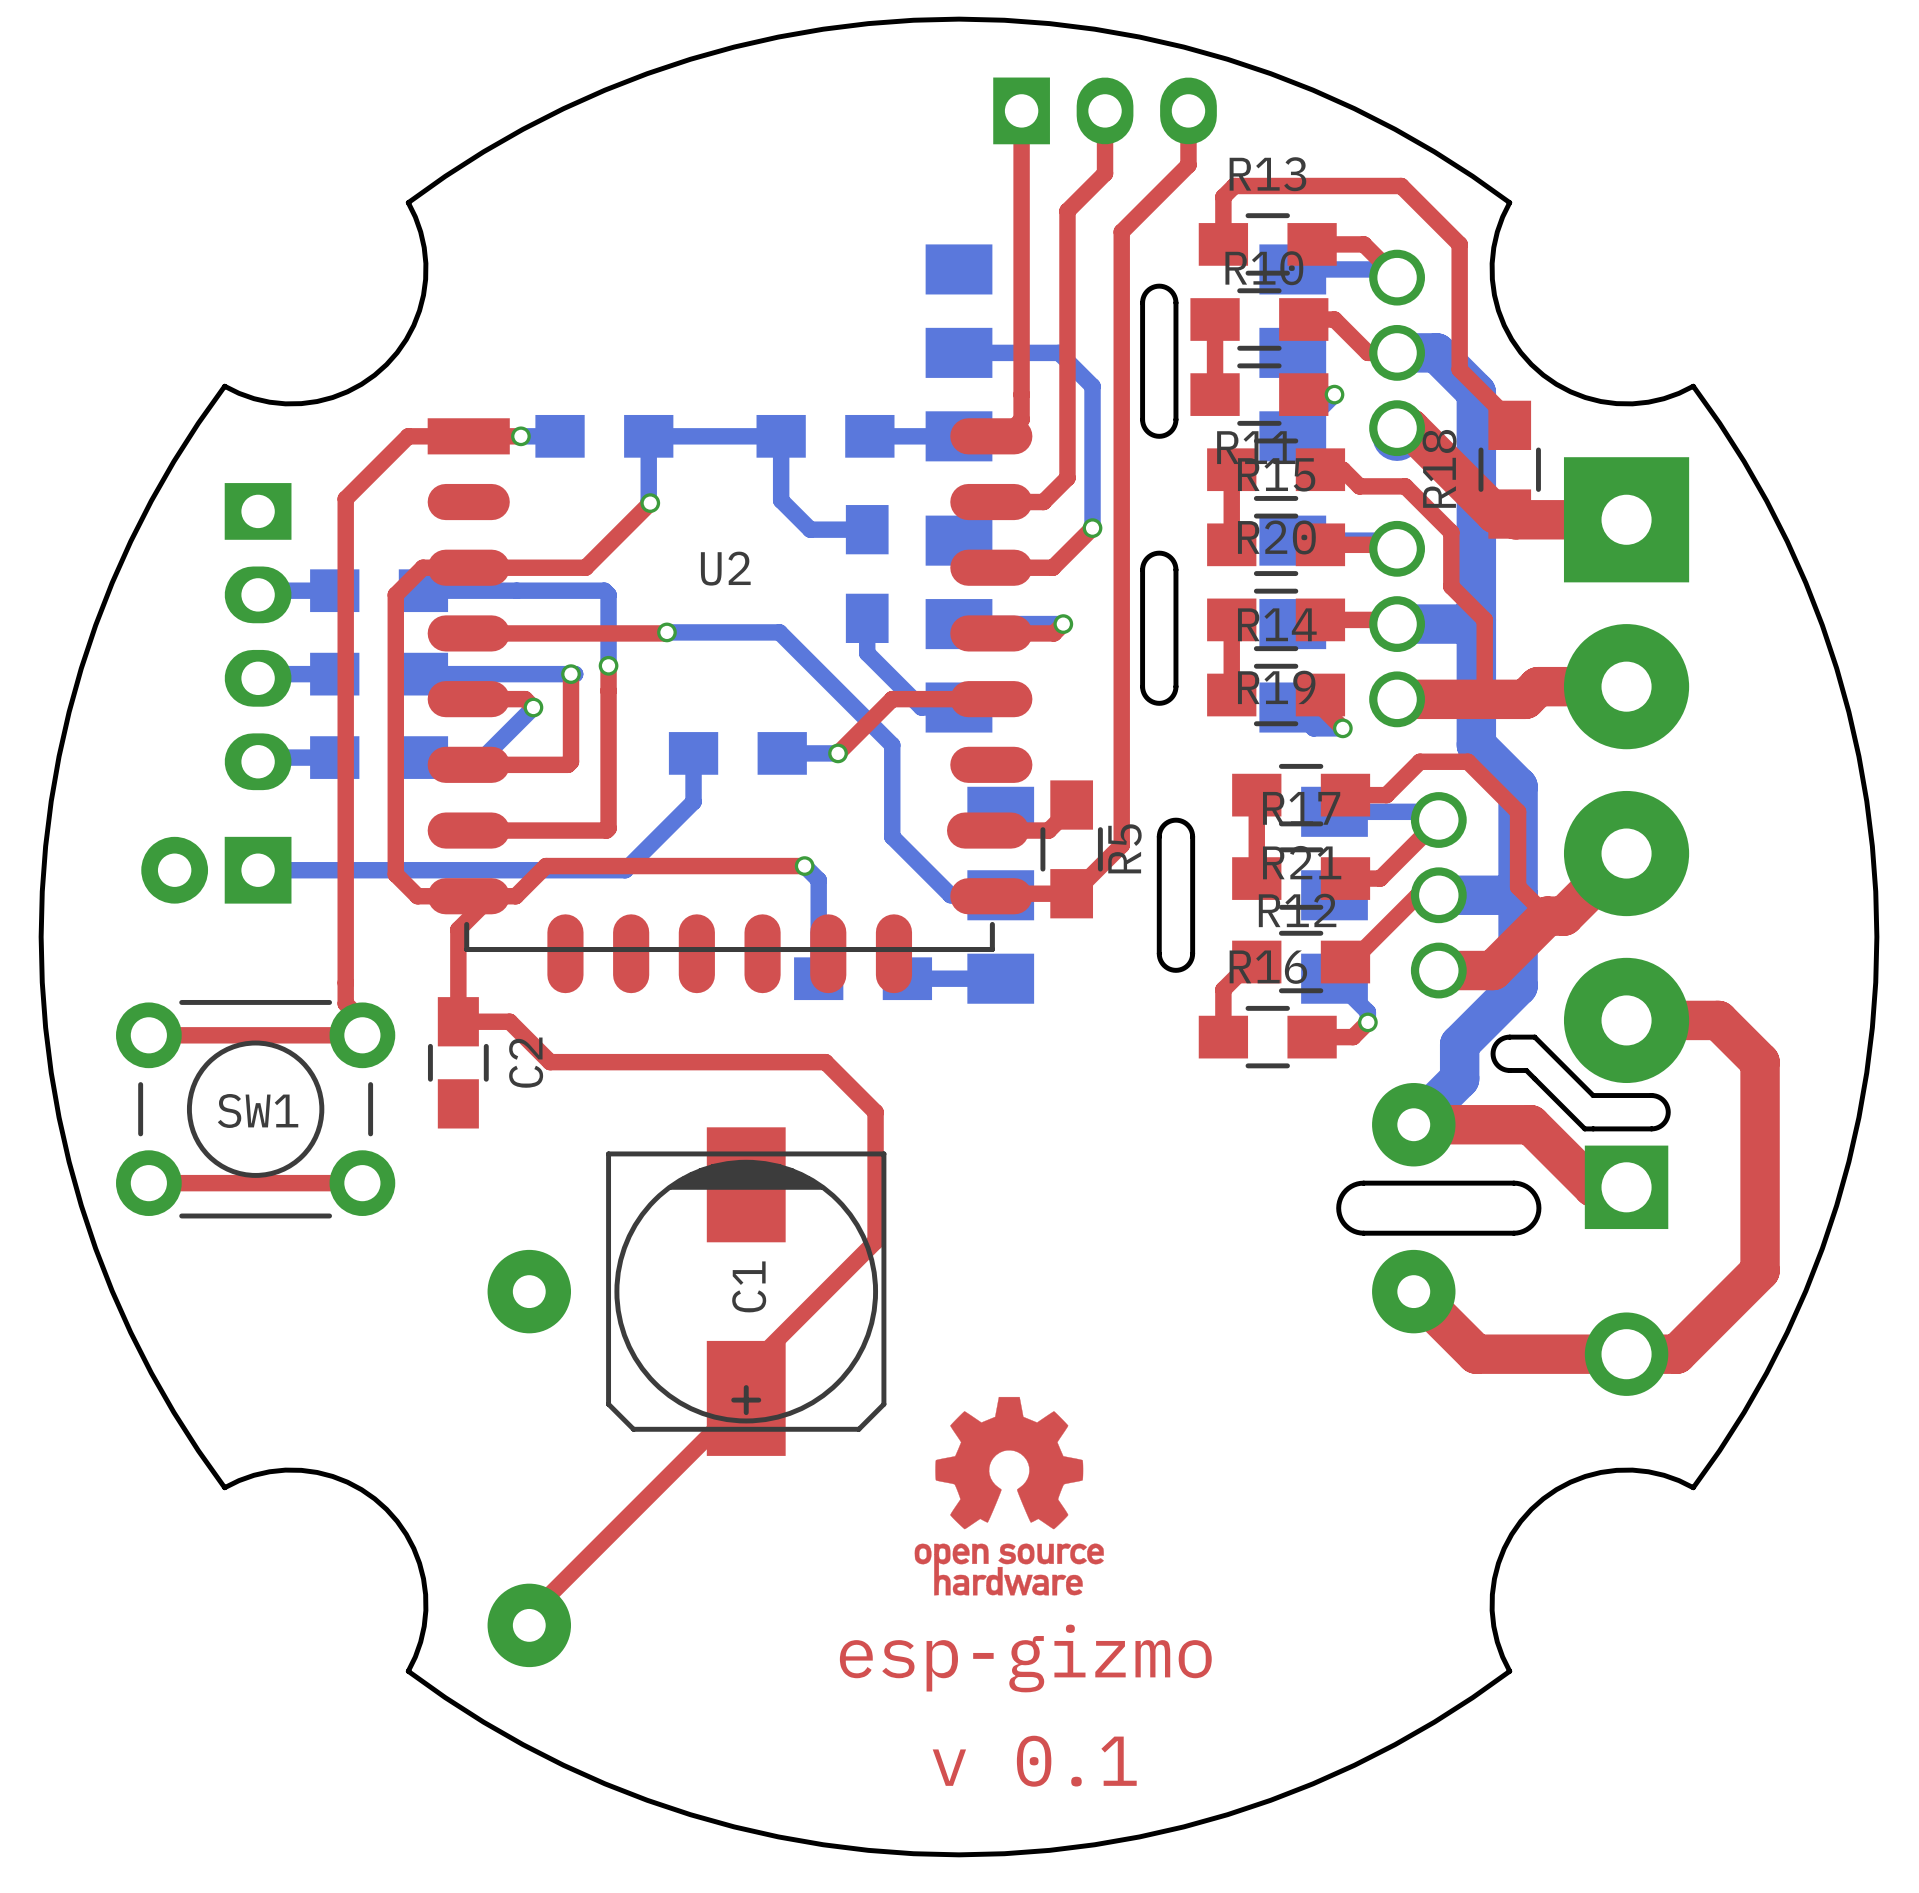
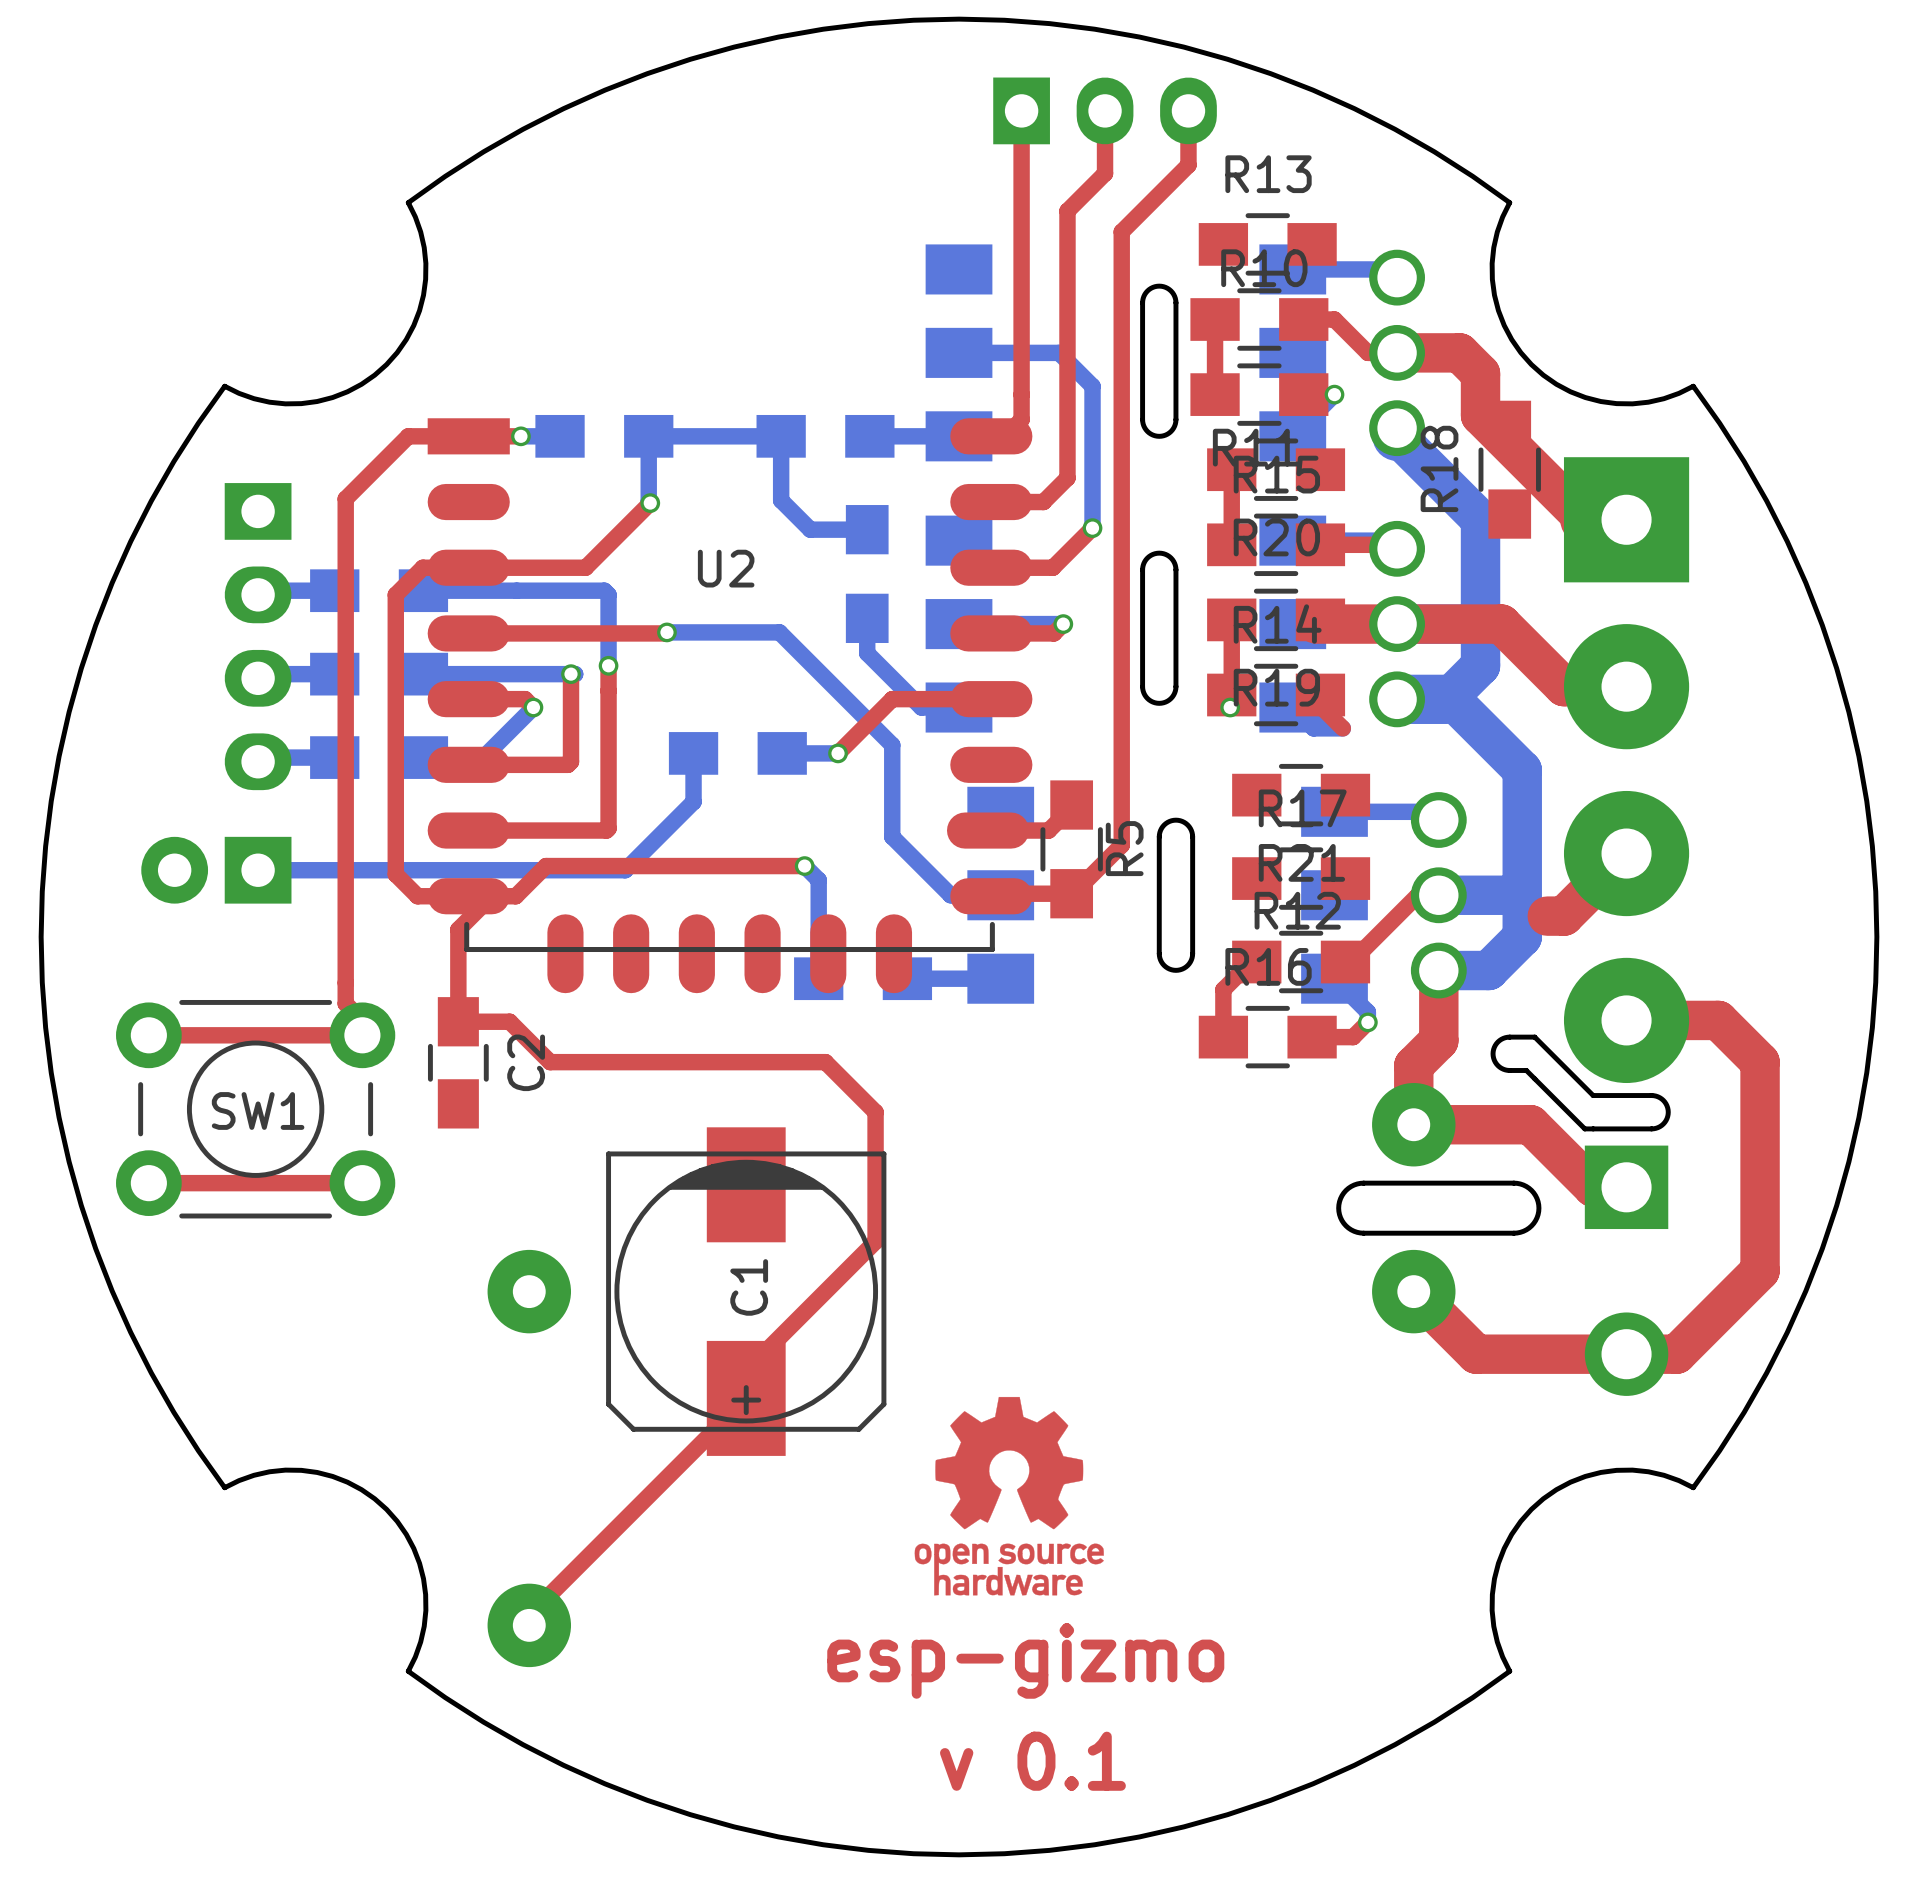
top track: (1223, 244) (1223, 196) (1234, 186) (1401, 186) (1459, 244) (1459, 369) (1509, 419) (1509, 425) -> none
top track: (1312, 244) (1363, 244) (1397, 277) -> none
top track: none -> (1397, 352) (1459, 352) (1480, 373) (1480, 415) (1584, 519)
bottom track: (1397, 352) (1436, 352) (1476, 392) (1476, 745) (1518, 786) (1518, 986) (1459, 1044) (1459, 1078) (1413, 1124) -> none
top track: (1397, 428) (1409, 428) (1495, 514) (1509, 514) (1515, 519) (1626, 519) -> none
bottom track: none -> (1397, 436) (1480, 519) (1480, 665) (1446, 699) (1397, 699) (1451, 699) (1522, 770) (1522, 936) (1488, 970) (1438, 970)
top track: (1320, 469) (1342, 469) (1359, 486) (1405, 486) (1451, 532) (1451, 586) (1484, 619) (1484, 699) -> none
top track: (1563, 686) (1538, 686) (1525, 699) (1397, 699) -> (1563, 686) (1501, 624) (1316, 624)
via position: (1342, 728) -> (1230, 707)
top track: (1256, 795) (1256, 878) -> none
top track: (1345, 795) (1386, 795) (1419, 761) (1468, 761) (1518, 811) (1518, 886) (1547, 916) (1492, 970) (1438, 970) -> (1413, 1124) (1413, 1065) (1438, 1040) (1438, 970)
top track: (1438, 820) (1380, 878) (1345, 878) -> none

